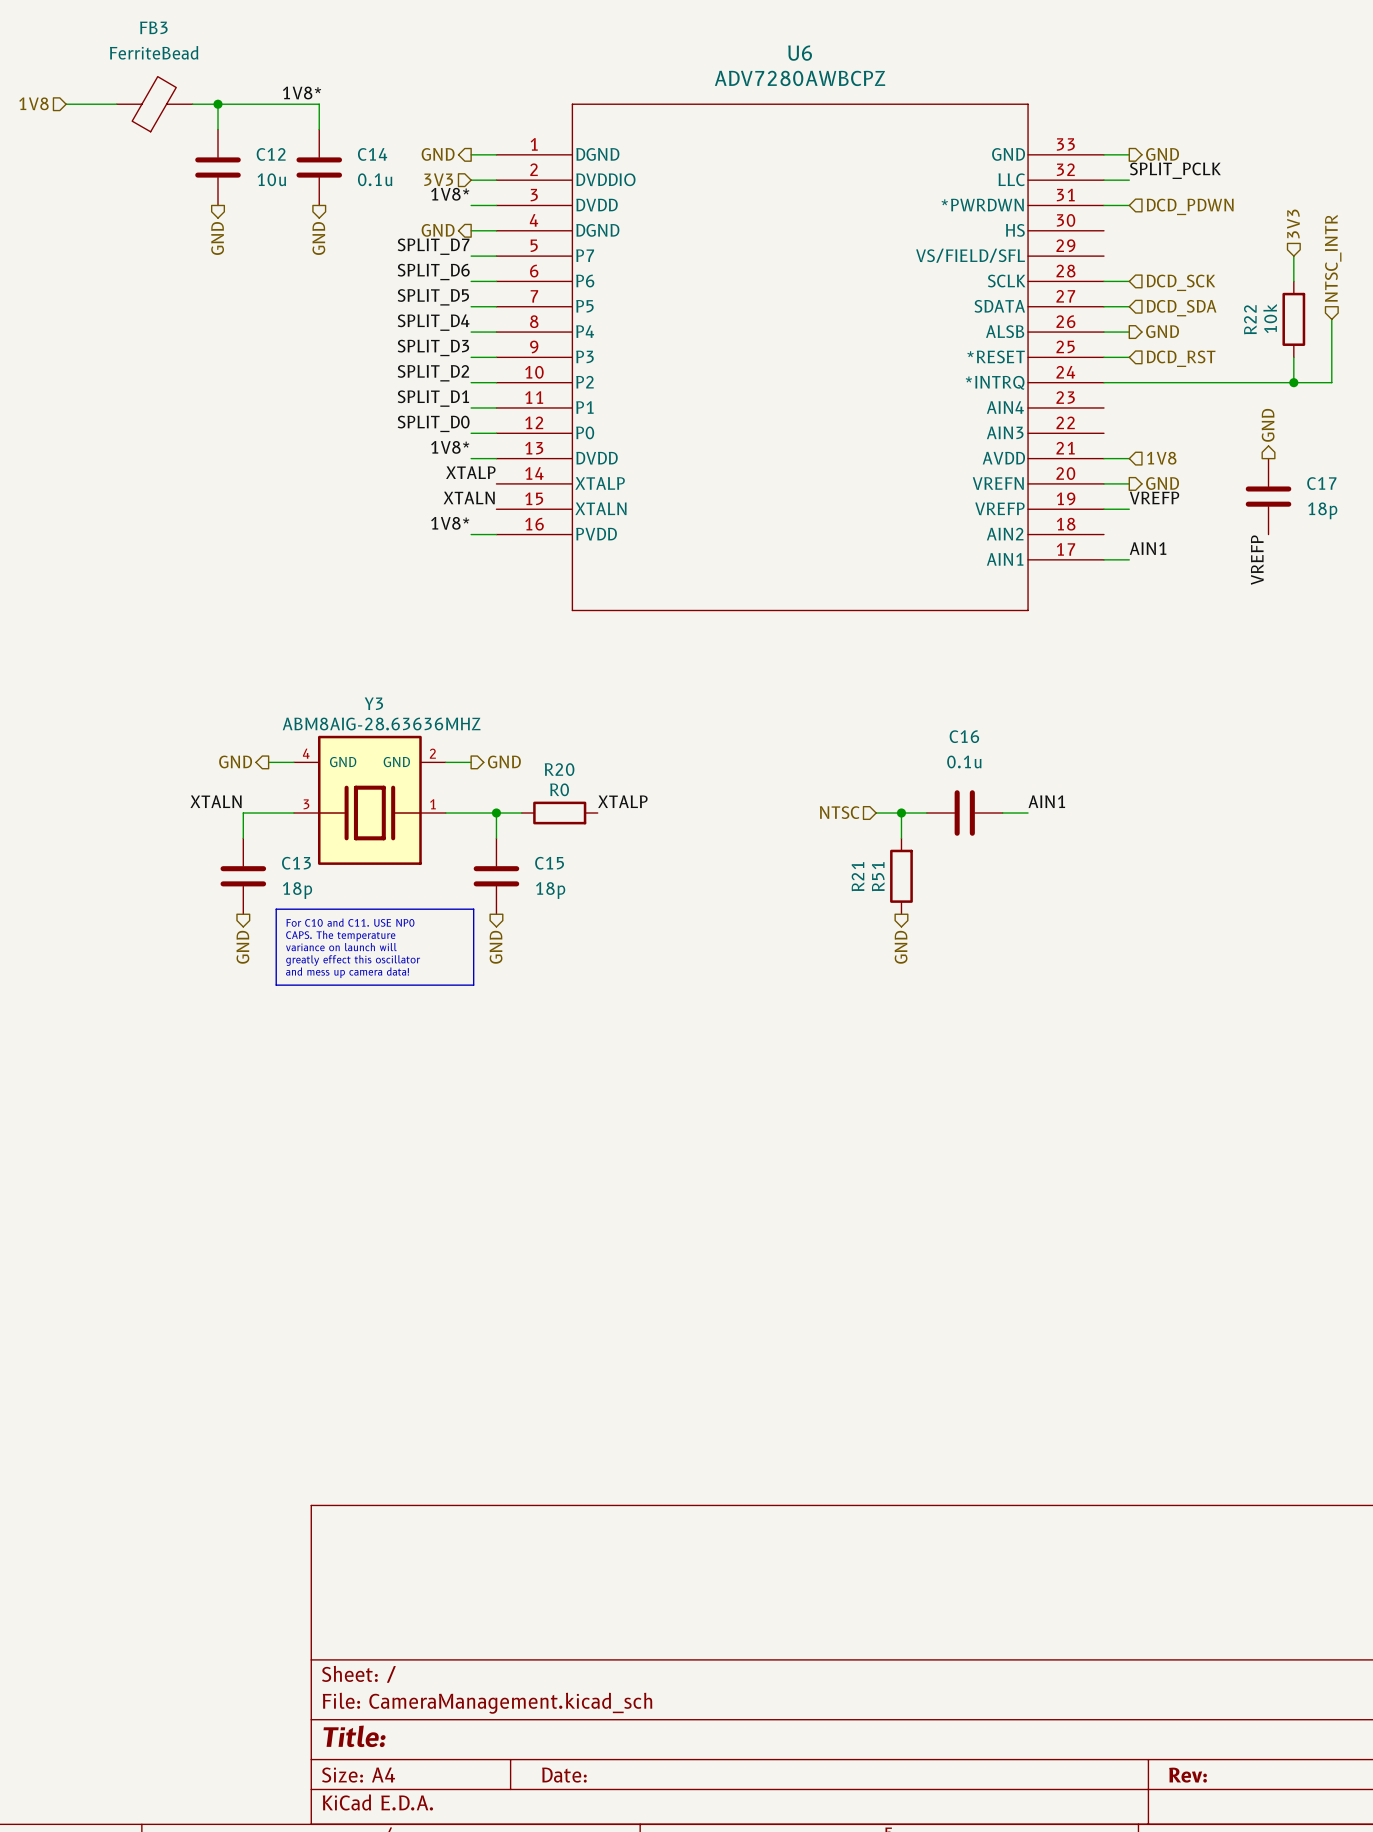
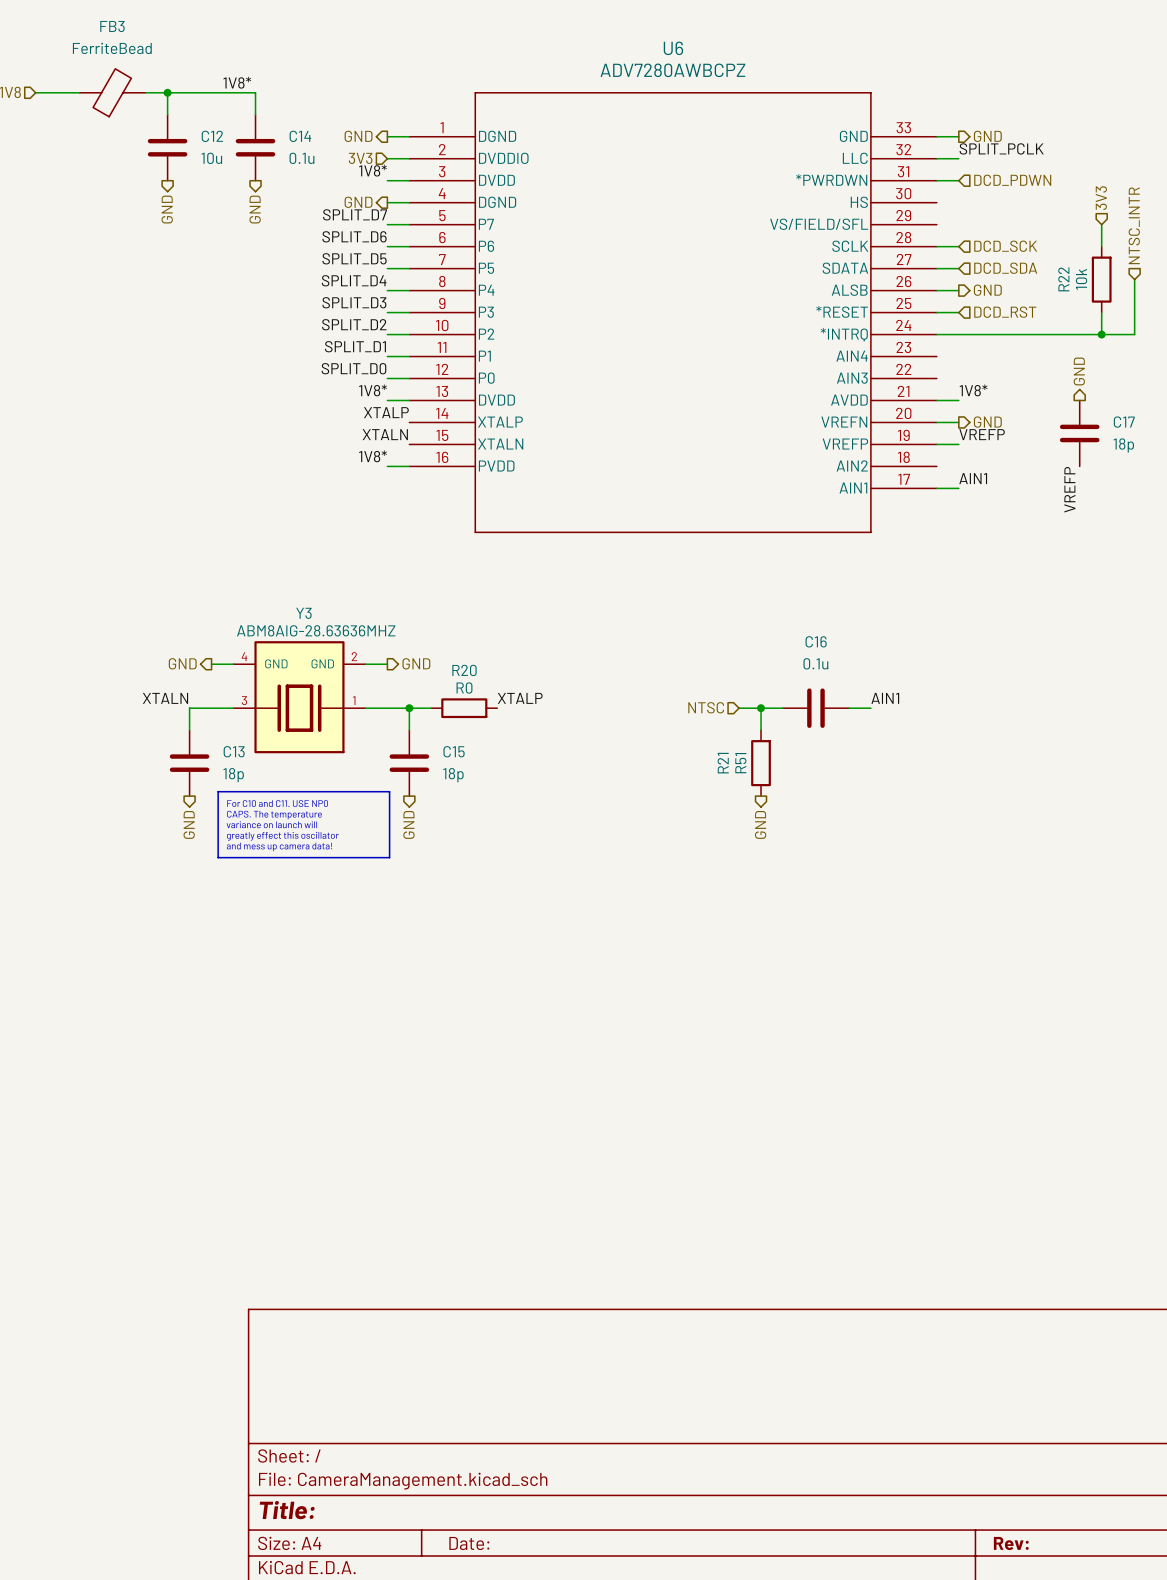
label: none -> 1V8* (973, 390)
hierarchical label: 1V8 (1161, 458) -> none

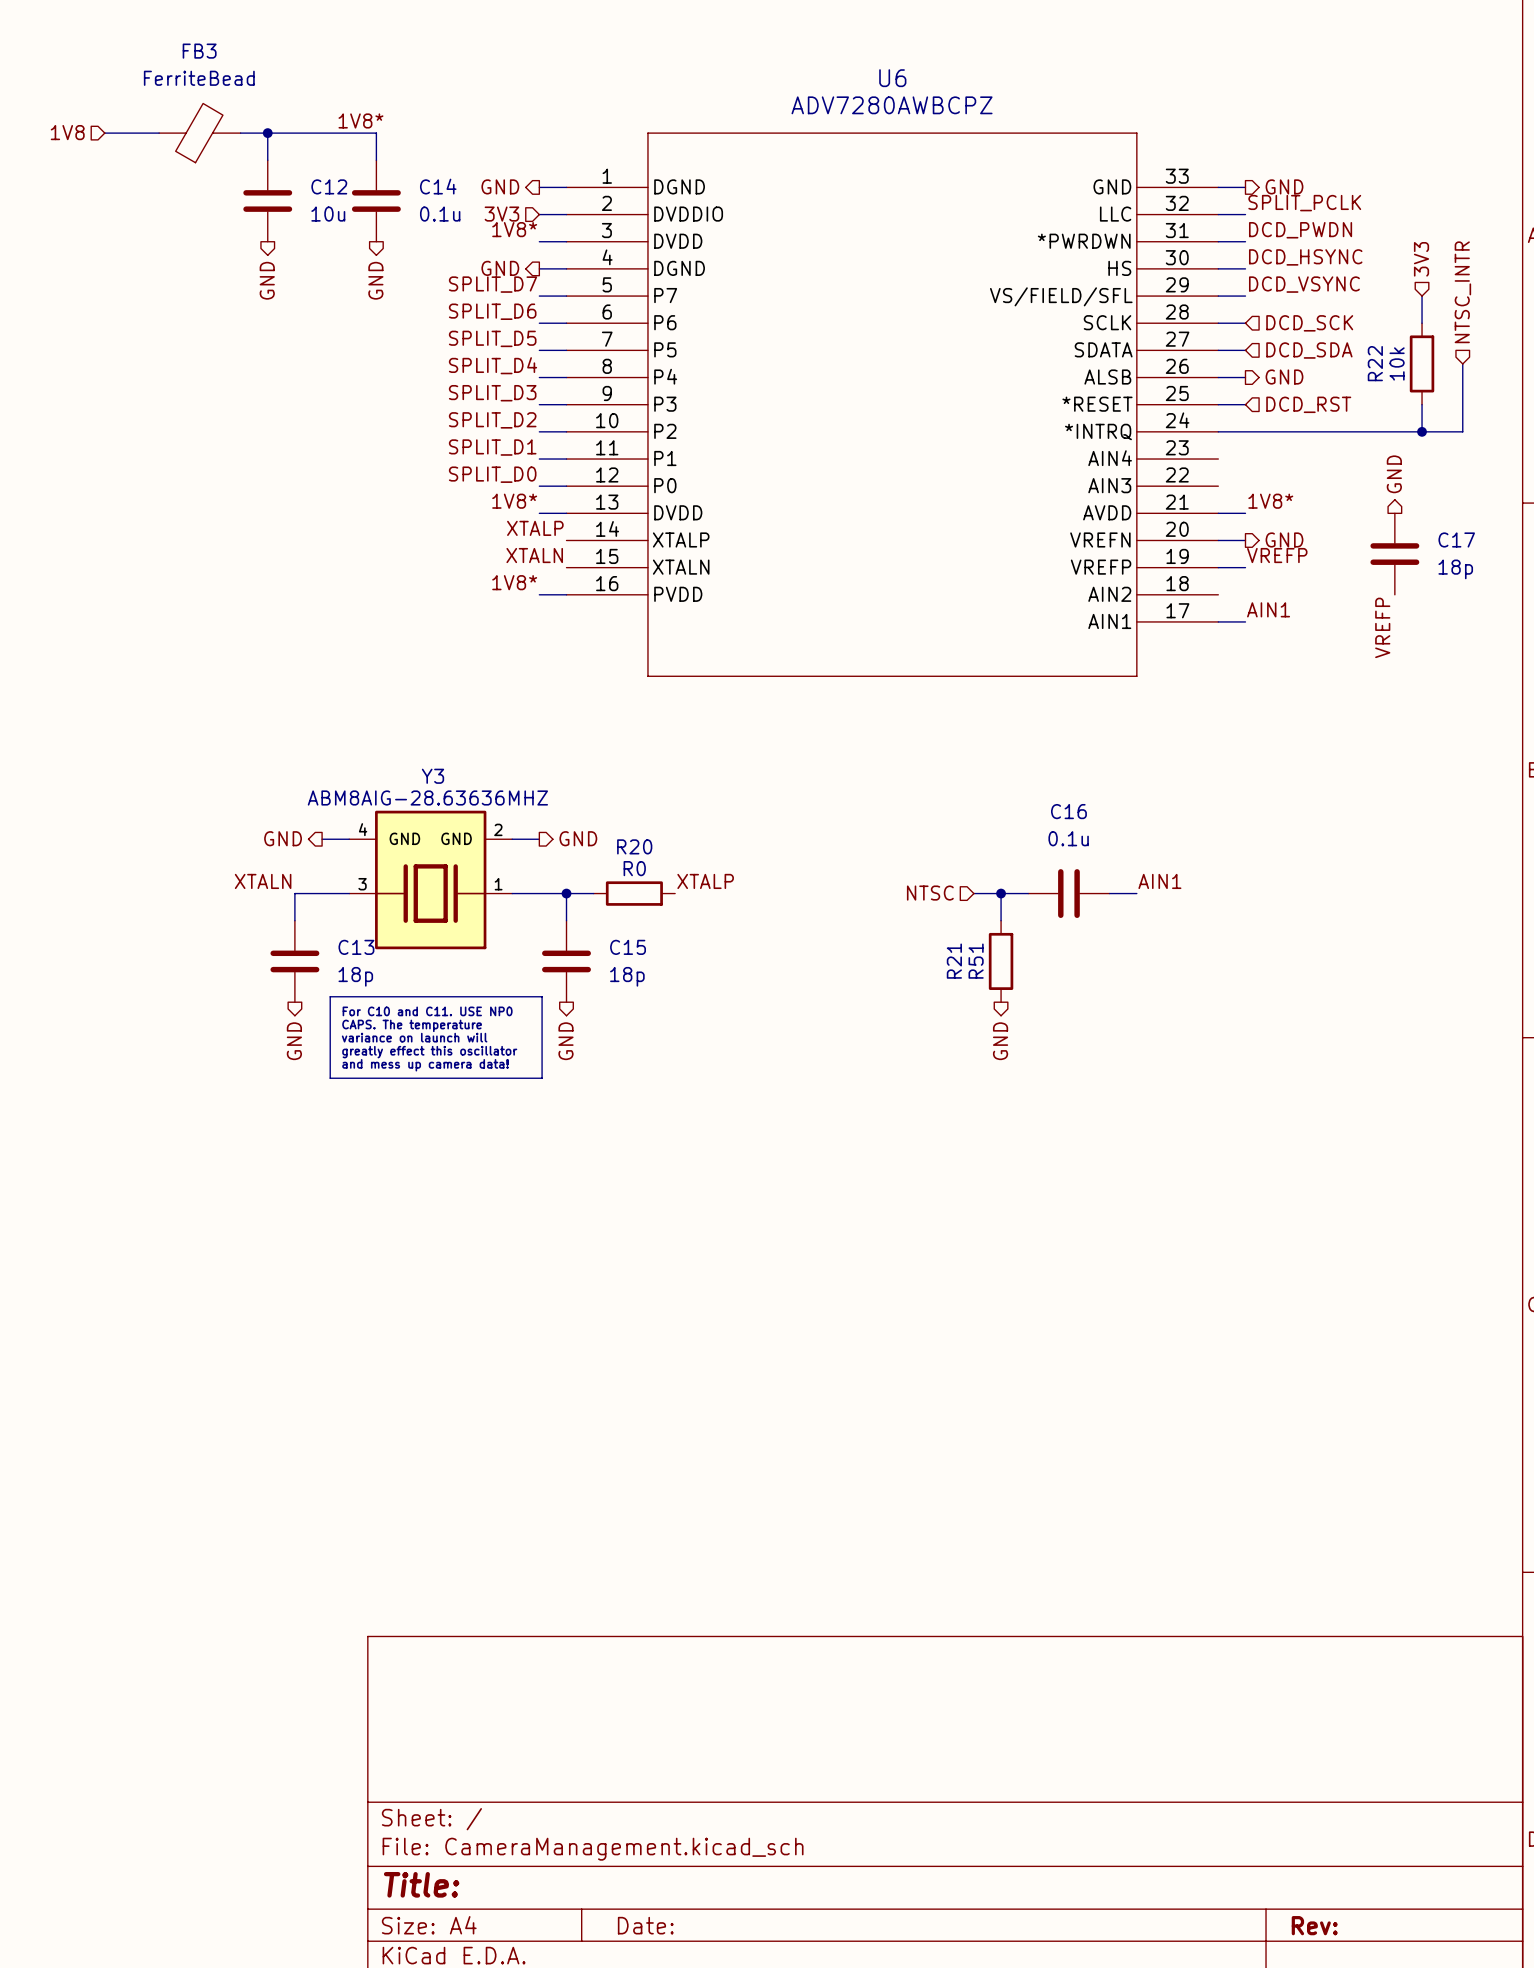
label: none -> DCD_PWDN (1300, 230)
hierarchical label: DCD_PDWN (1012, 180) -> none
label: none -> DCD_HSYNC (1305, 257)
wire: none -> (1218, 268) (1245, 268)
label: none -> DCD_VSYNC (1304, 284)
wire: none -> (1218, 296) (1245, 296)

